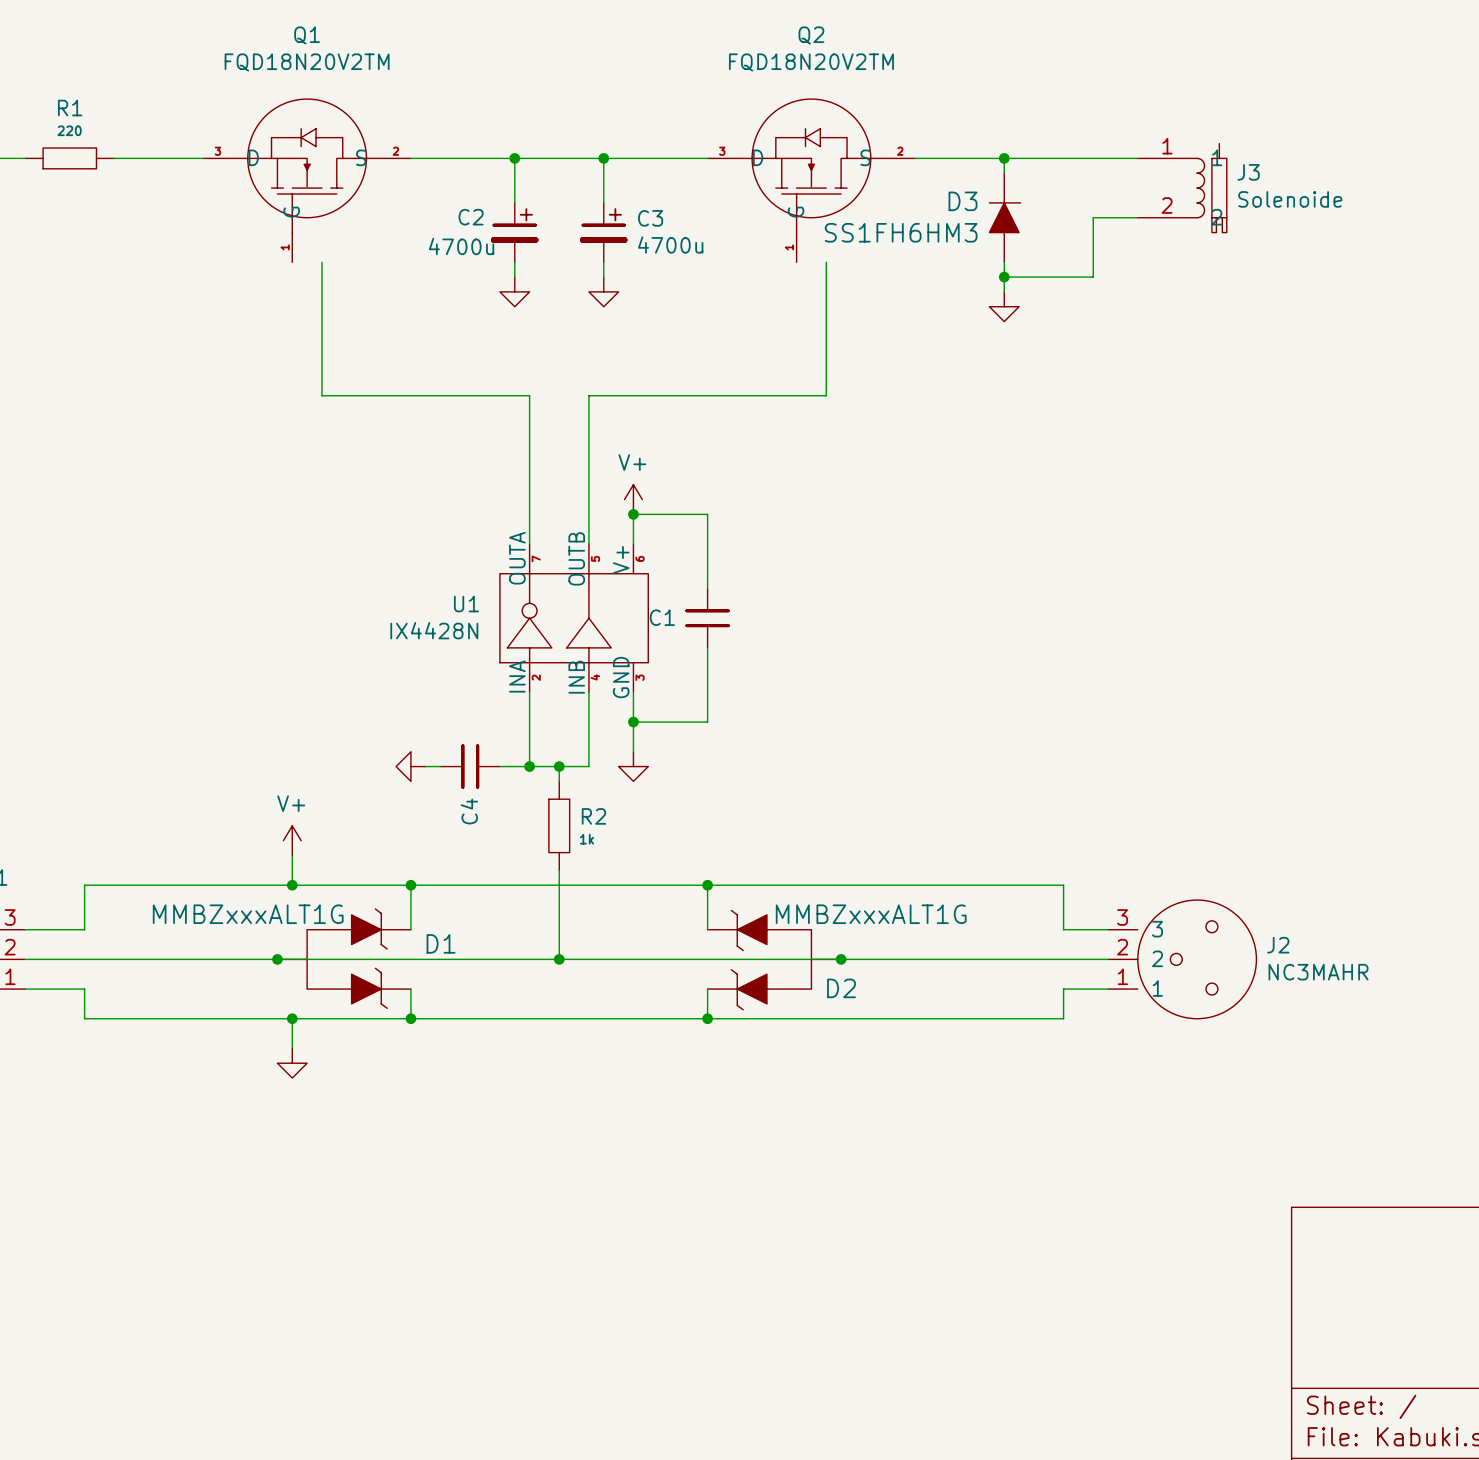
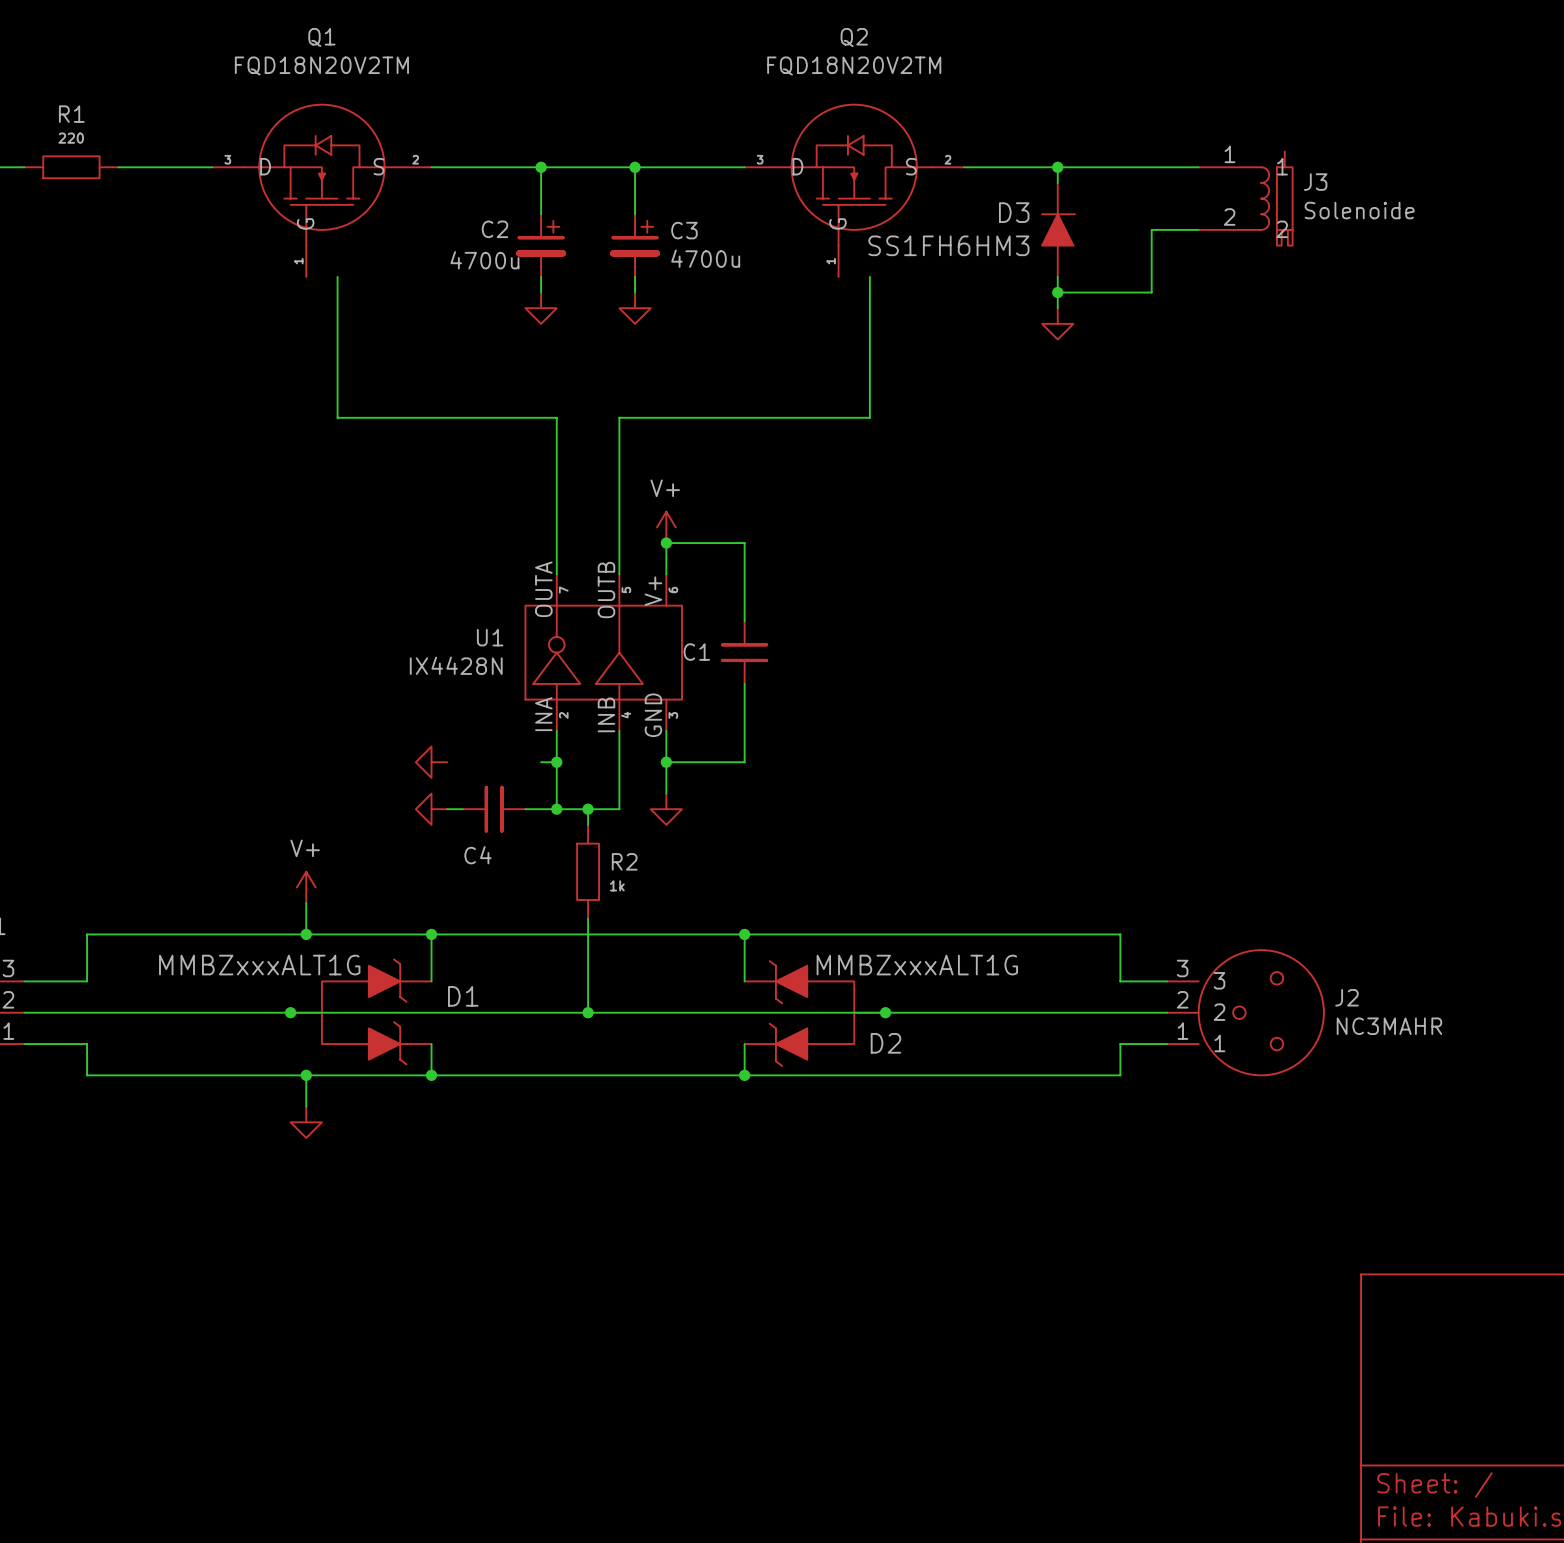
power symbol: none -> (431, 762)
wire: none -> (541, 762) (556, 762)
junction: none -> (556, 762)
C4 name rotation: 0° (469, 811) -> 90° clockwise (477, 855)

